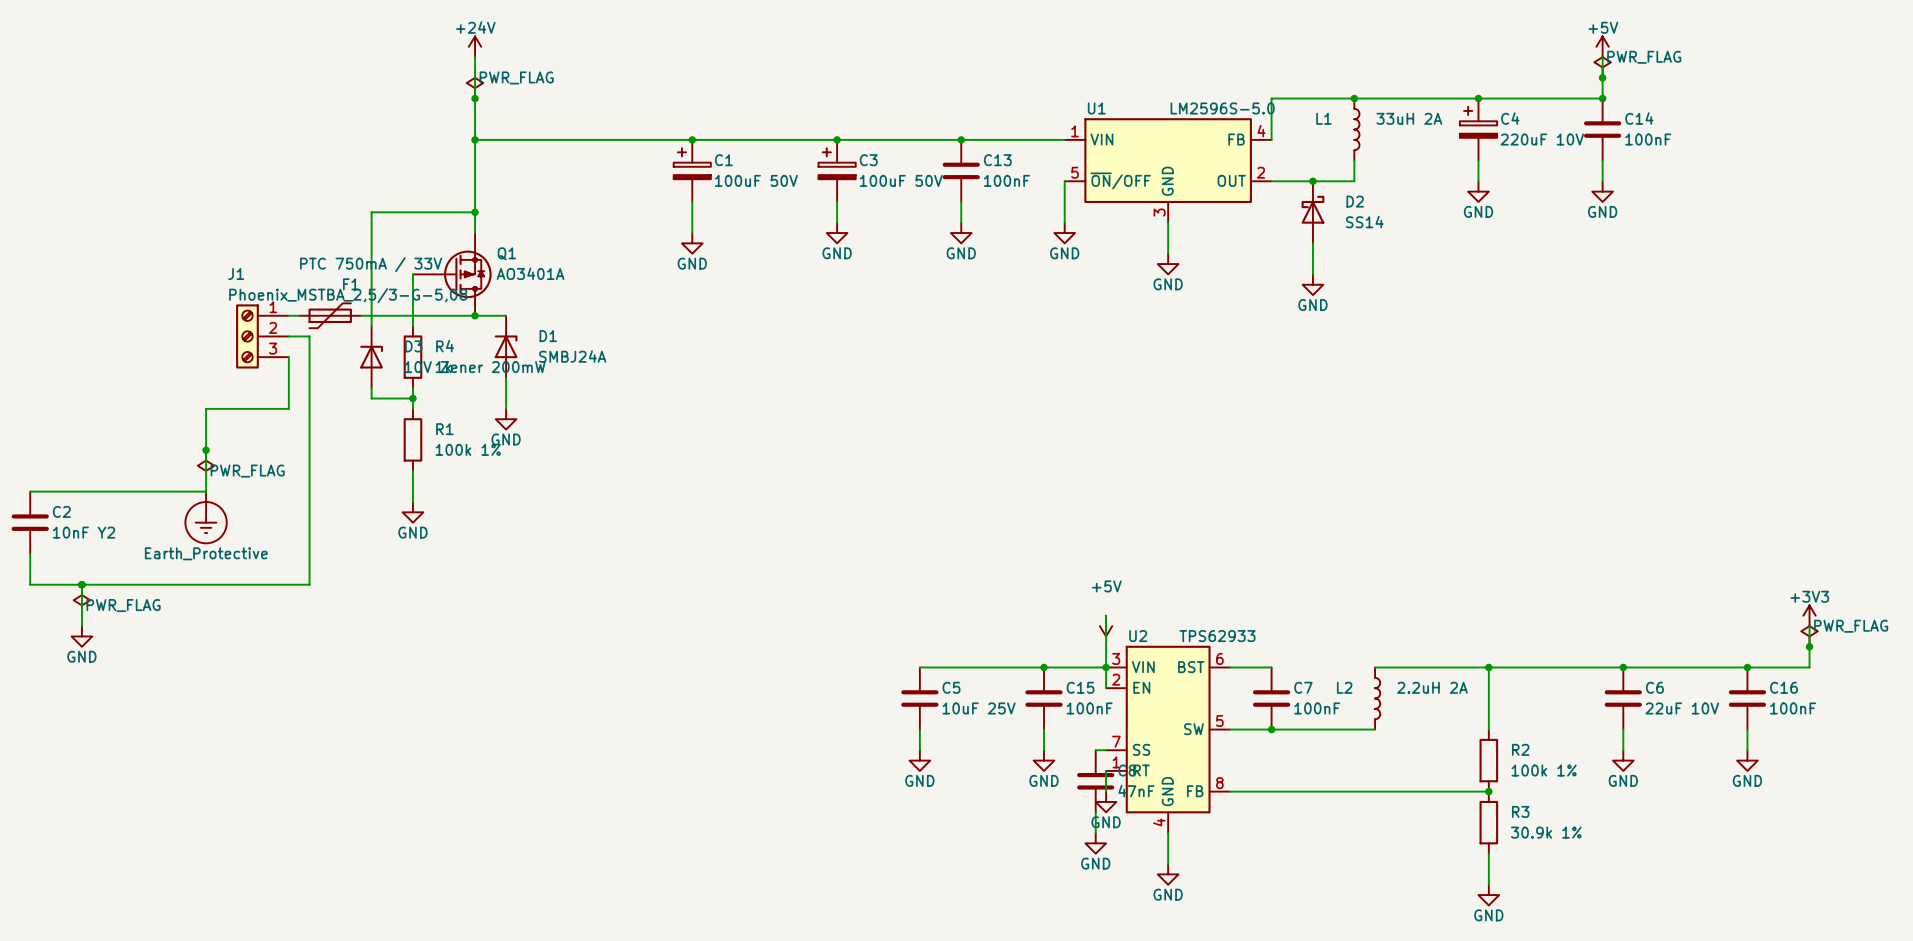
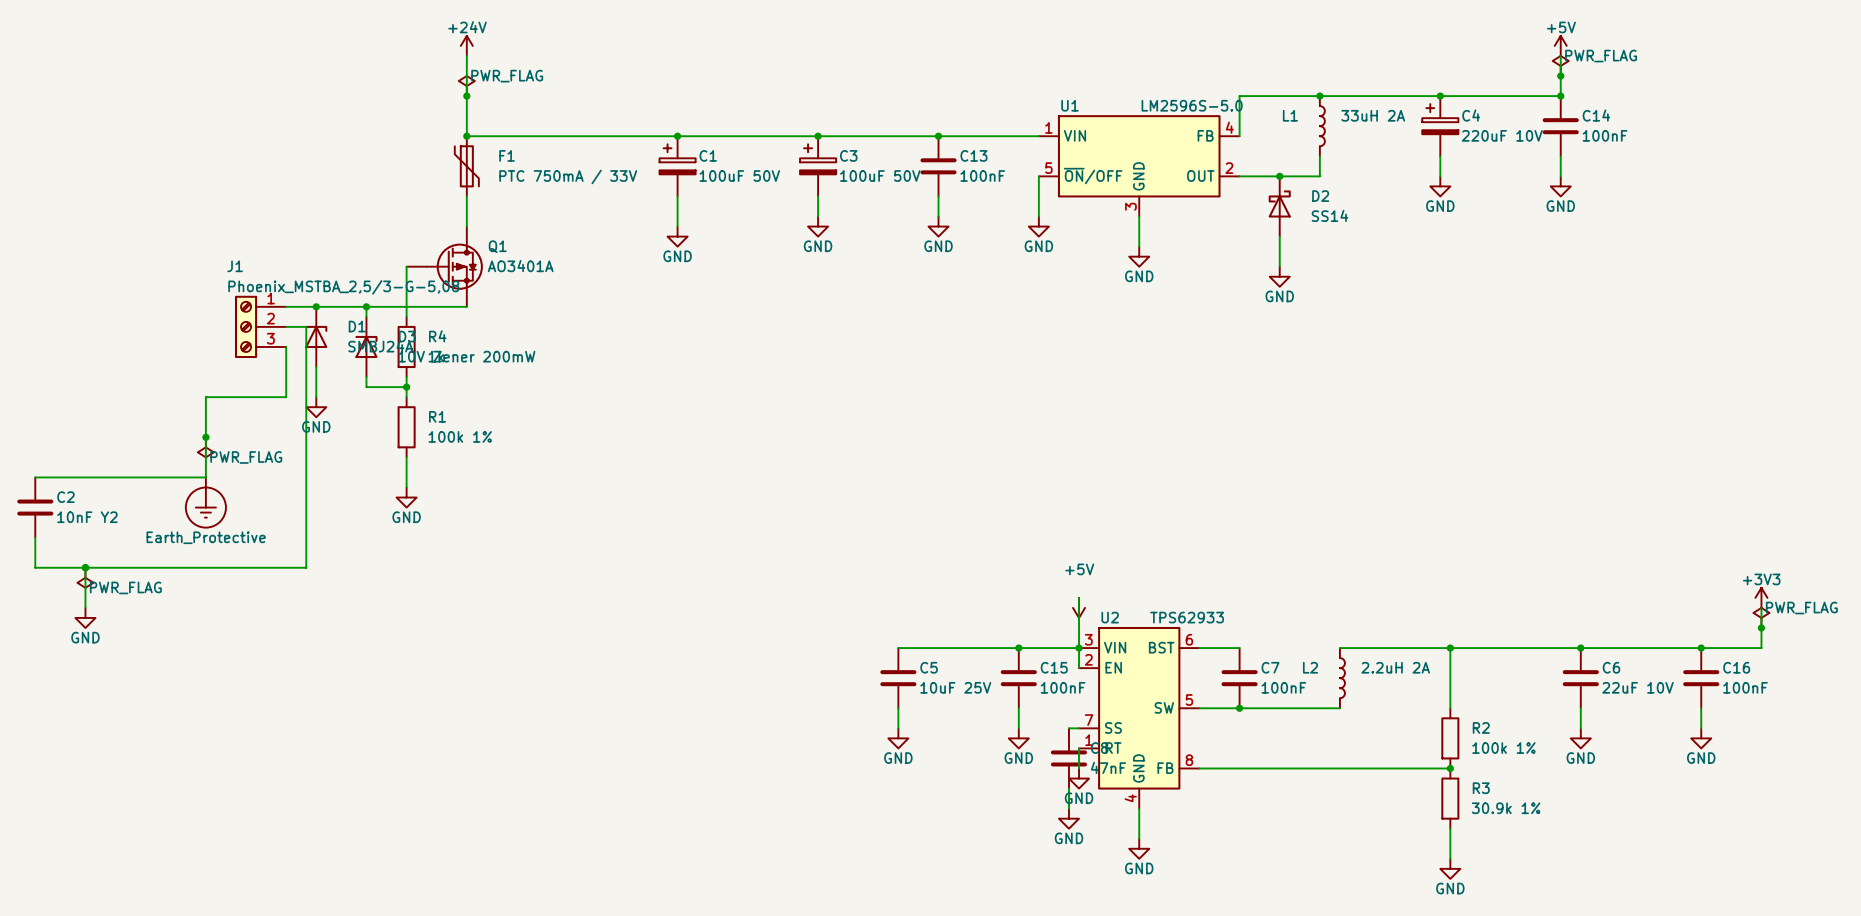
wire: (475, 212) (371, 212) (371, 315) -> none
junction: (475, 212) -> none
F1 value position: PTC 750mA / 33V (371, 264) -> PTC 750mA / 33V (568, 176)
Q1 flip: as is (462, 274) -> up-down (454, 266)
F1 name position: F1 (350, 284) -> F1 (507, 155)
junction: none -> (316, 306)
F1 rotation: 0° (330, 315) -> 90° clockwise (466, 166)
F1 position: (330, 315) -> (466, 166)
junction: none -> (366, 306)
wire: (475, 315) (506, 315) -> none
junction: (475, 315) -> none
D1 position: (506, 346) -> (316, 336)
wire: (506, 377) (506, 408) -> (316, 367) (316, 397)
power symbol position: GND (506, 419) -> GND (316, 407)

